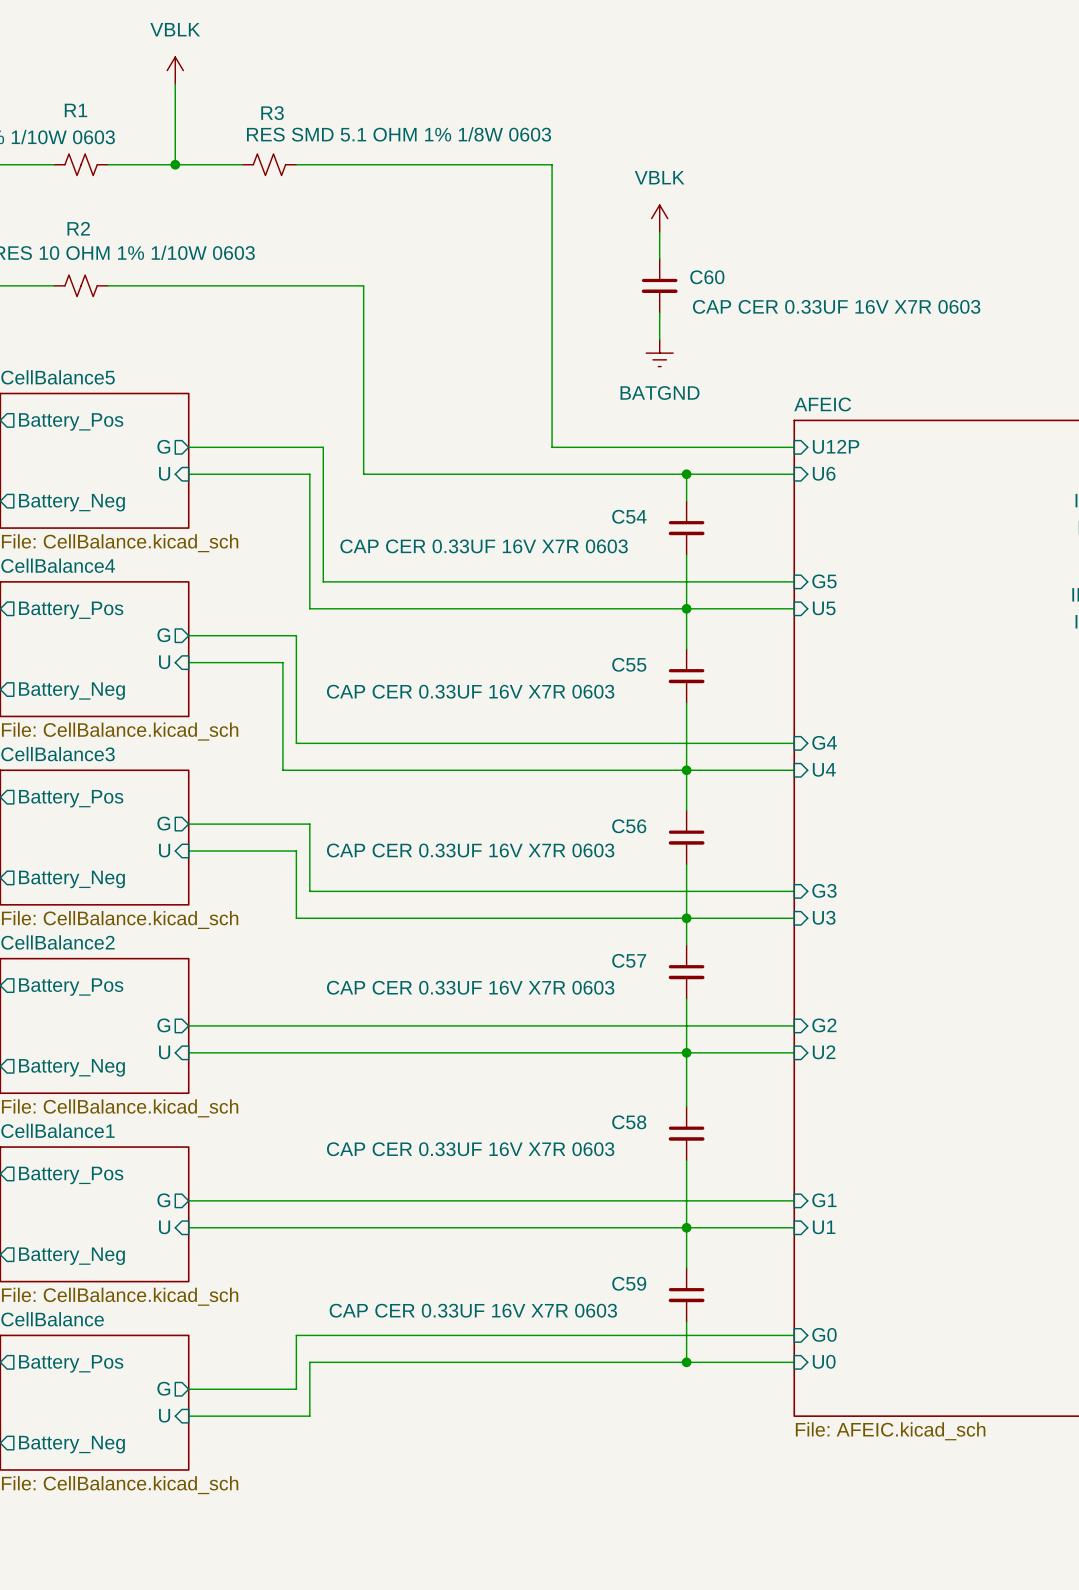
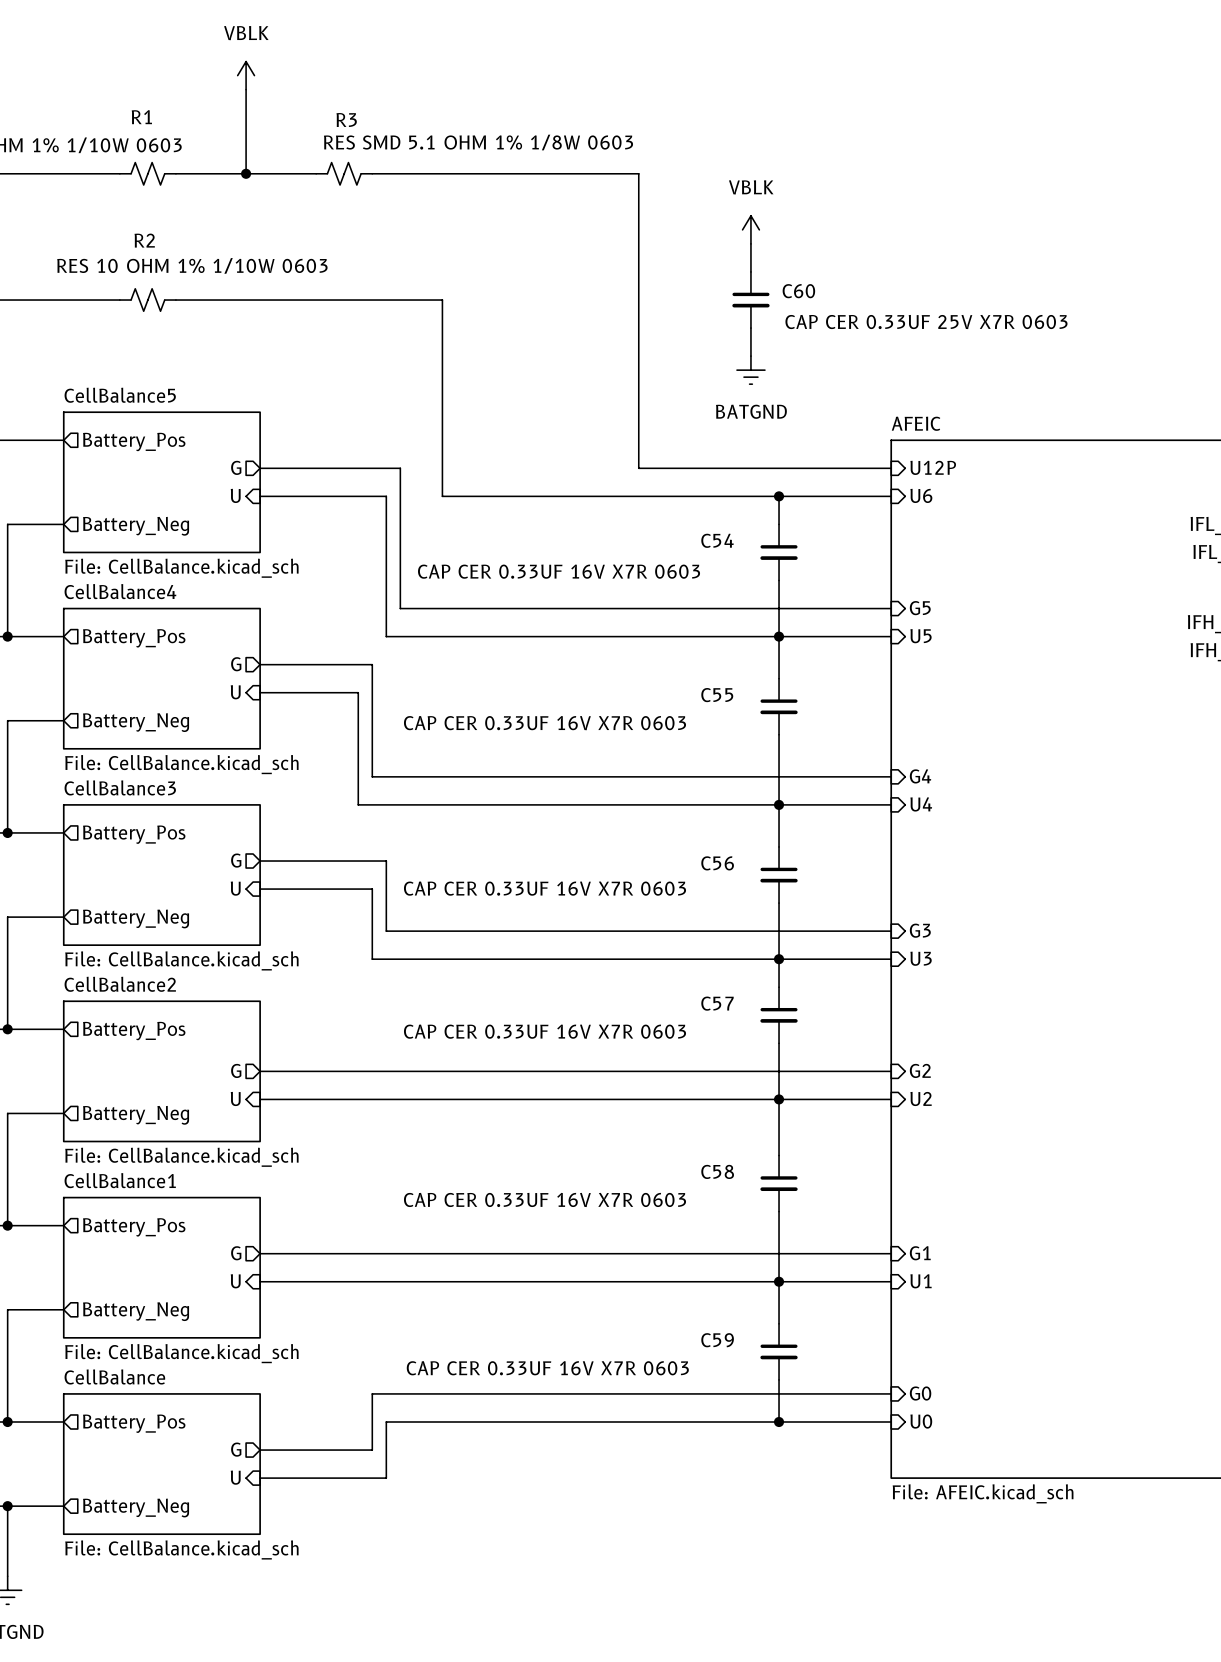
C60 value: CAP CER 0.33UF 16V X7R 0603 (836, 306) -> CAP CER 0.33UF 25V X7R 0603 (926, 322)

